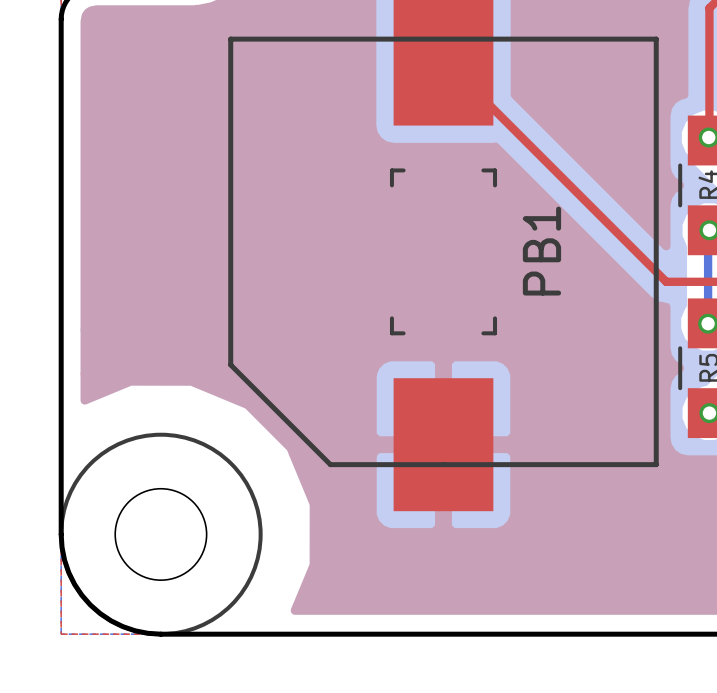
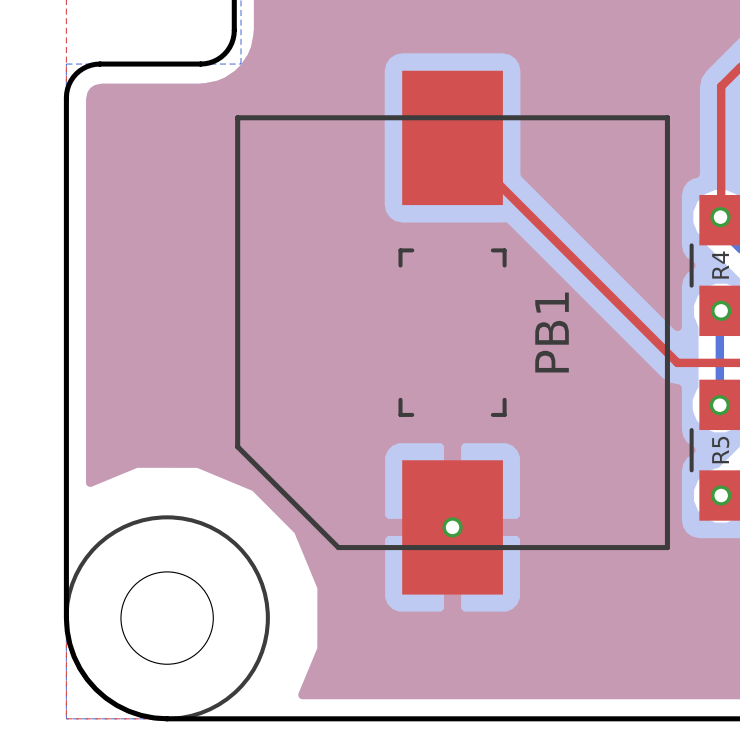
via: none -> (452, 527)

